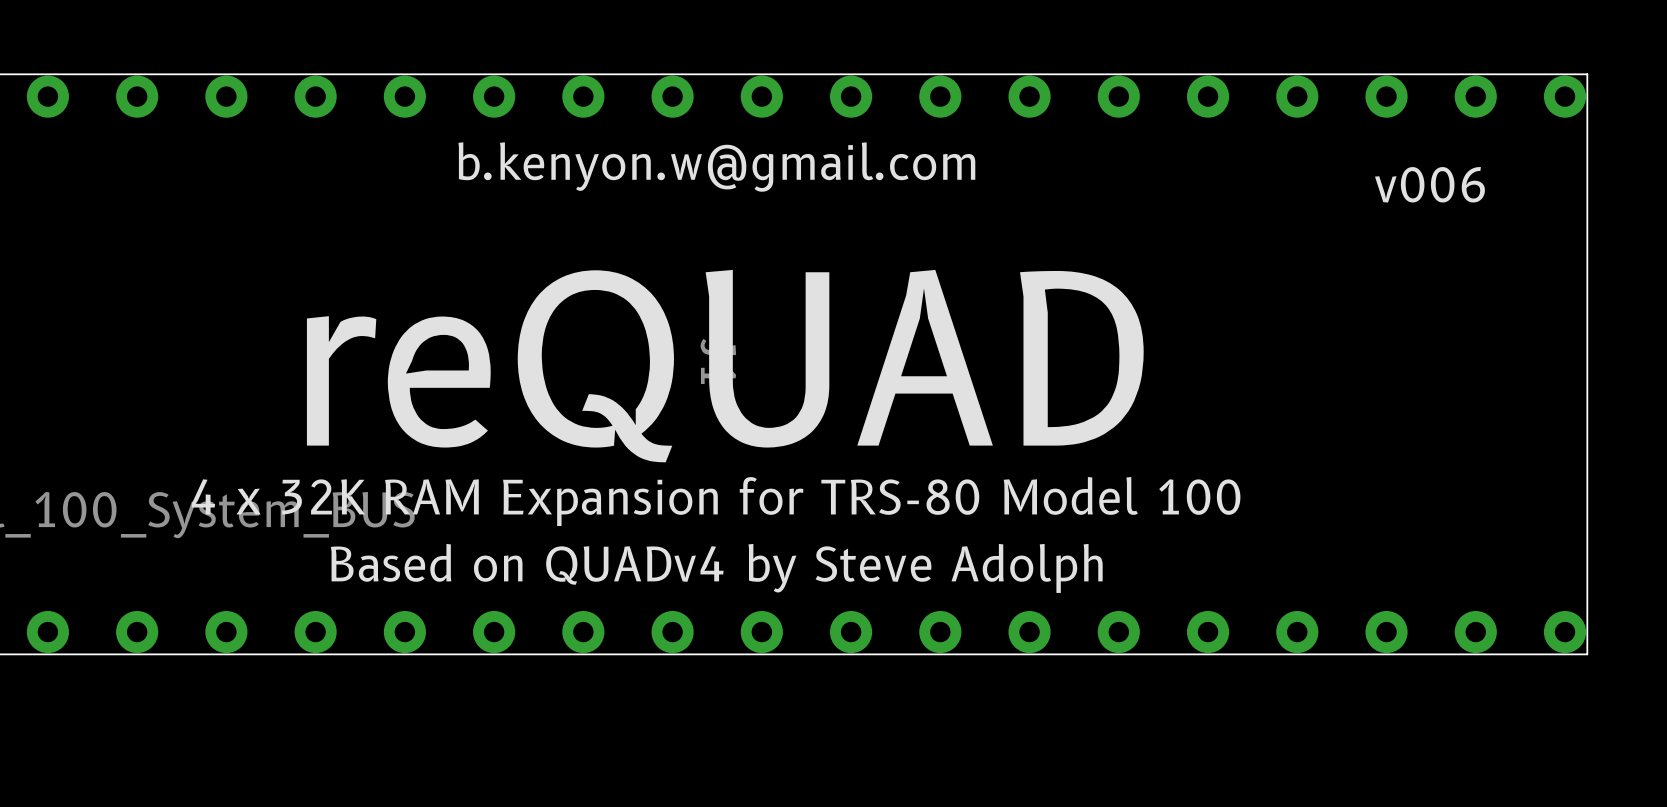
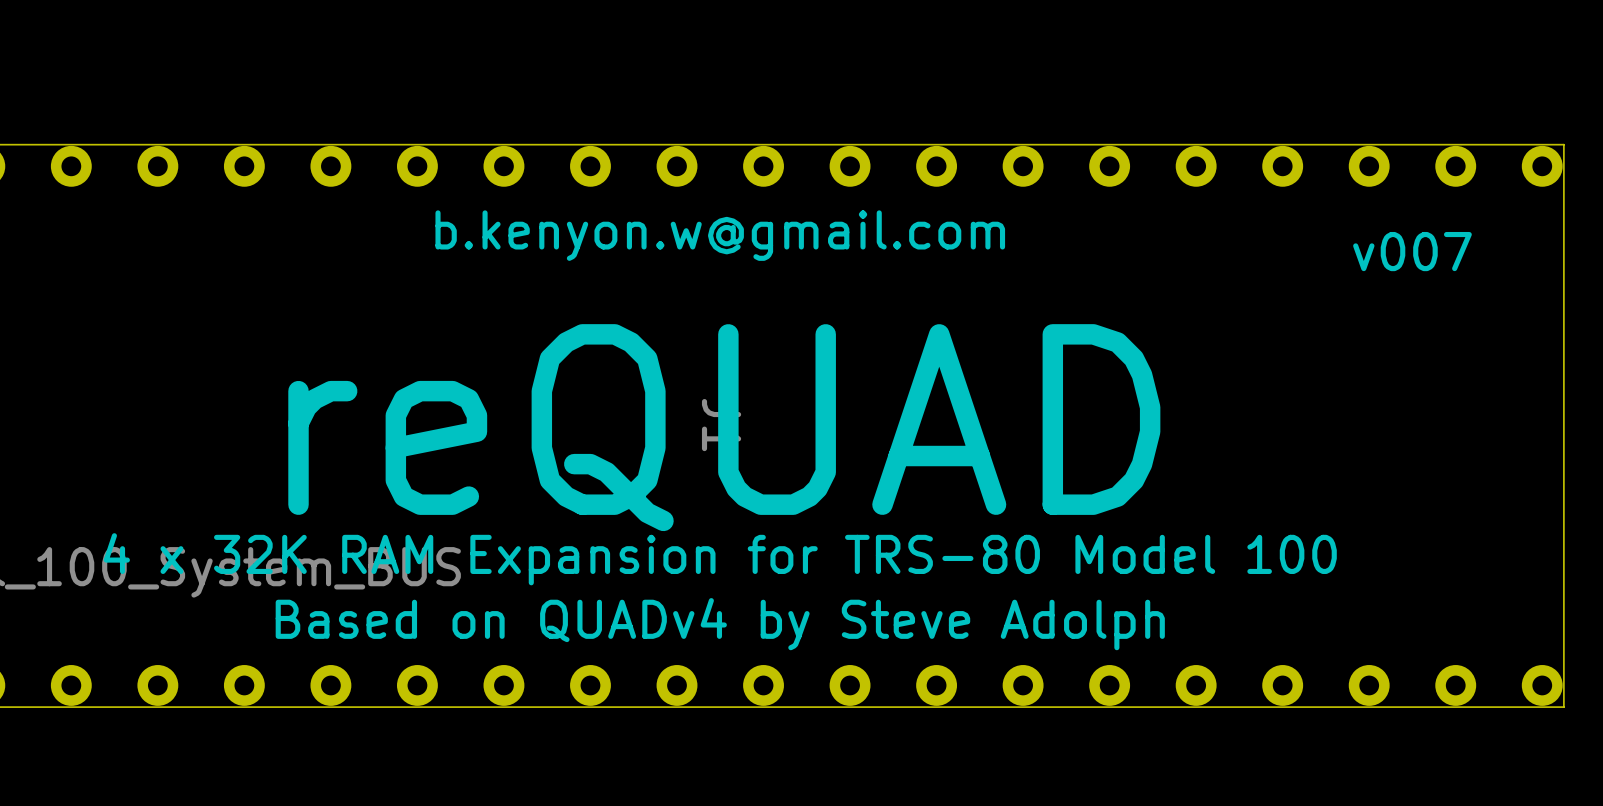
text: v006 (1429, 184) -> v007 (1412, 251)

